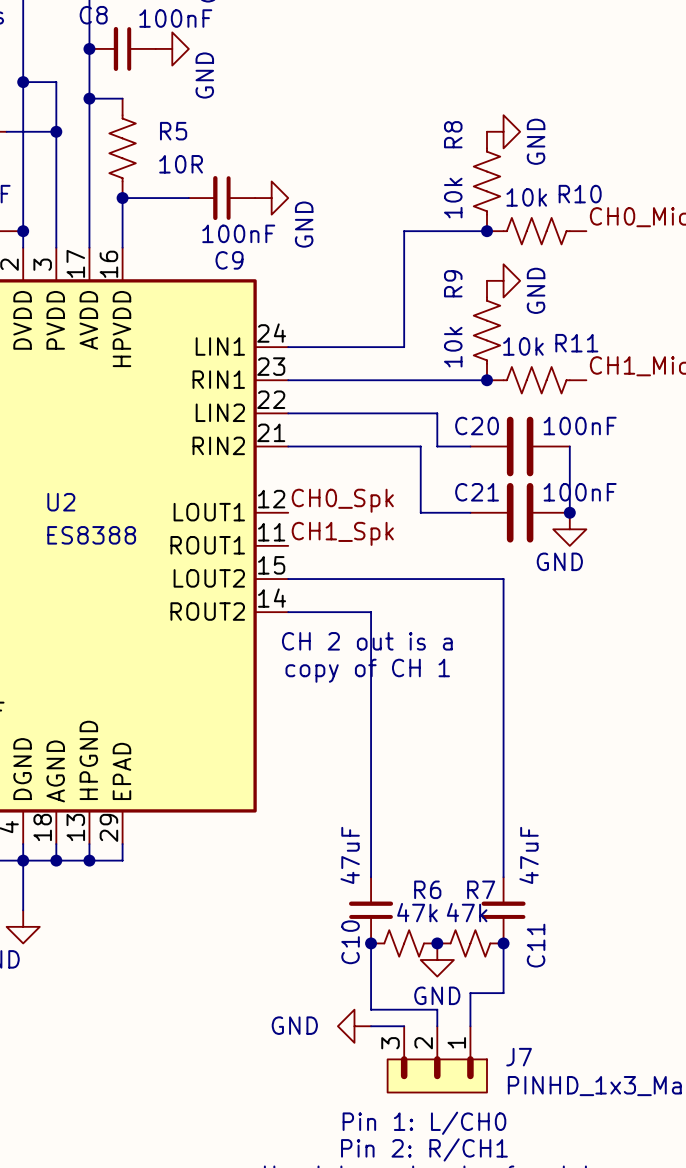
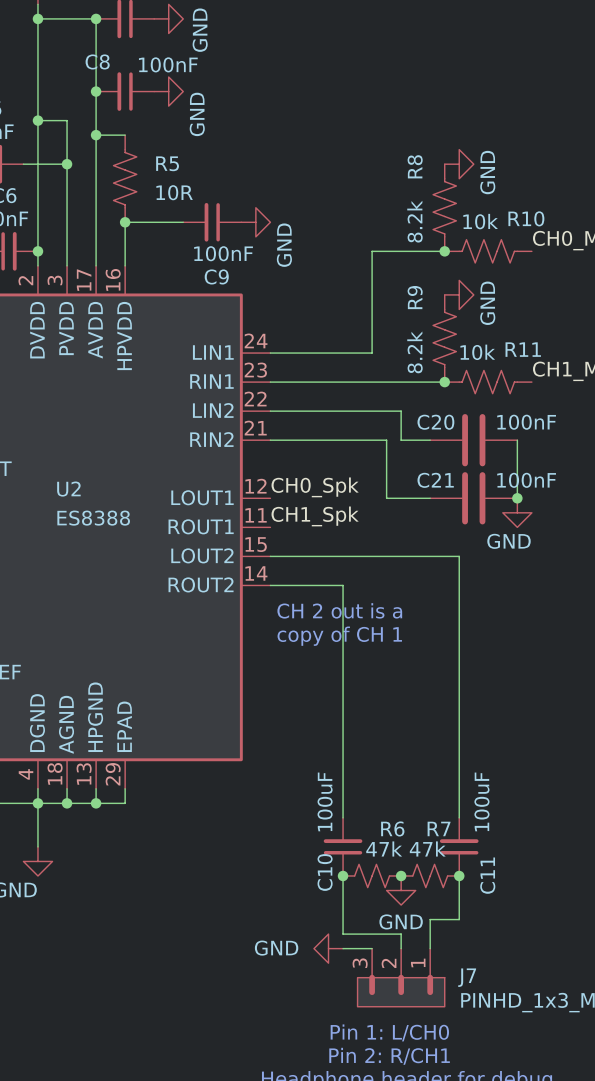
R8 value: 10k (453, 198) -> 8.2k (414, 221)
R9 value: 10k (453, 347) -> 8.2k (414, 352)
C10 value: 47uF (350, 855) -> 100uF (325, 801)
C11 value: 47uF (529, 855) -> 100uF (481, 801)

